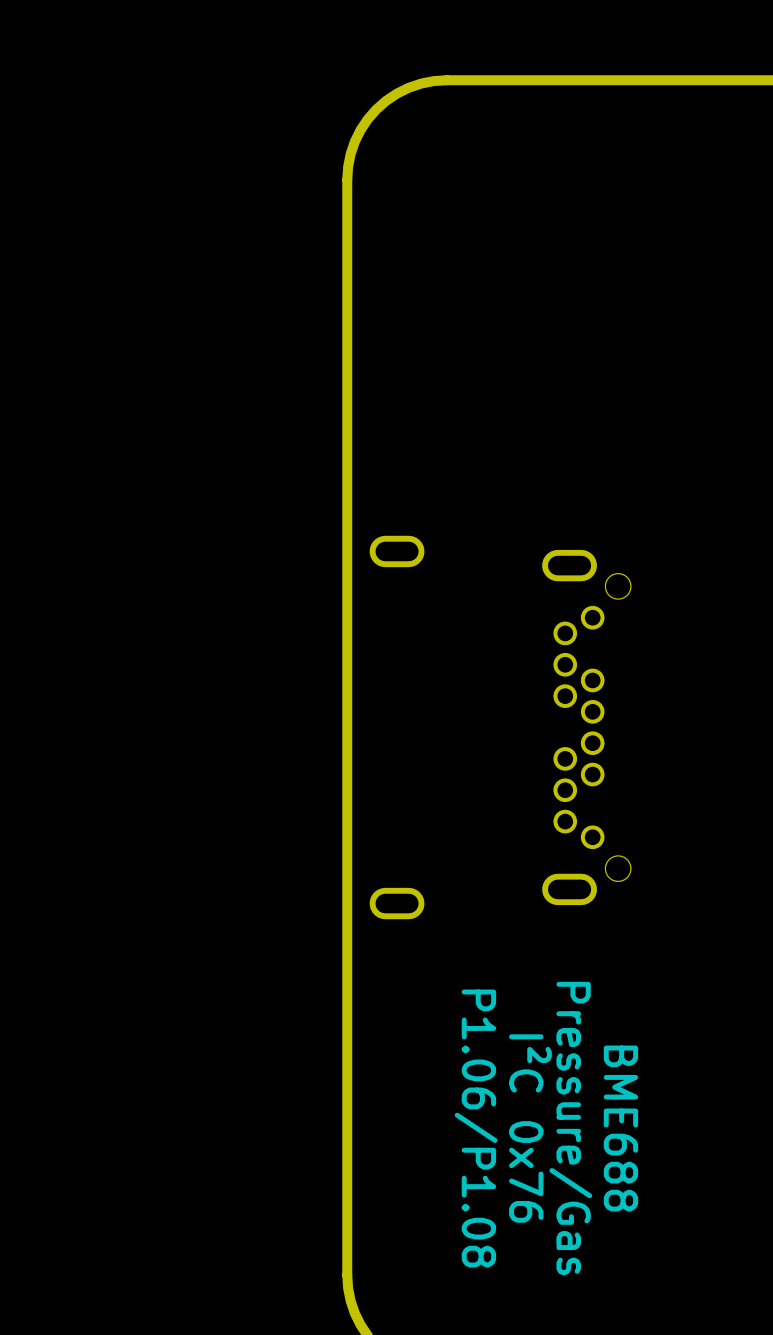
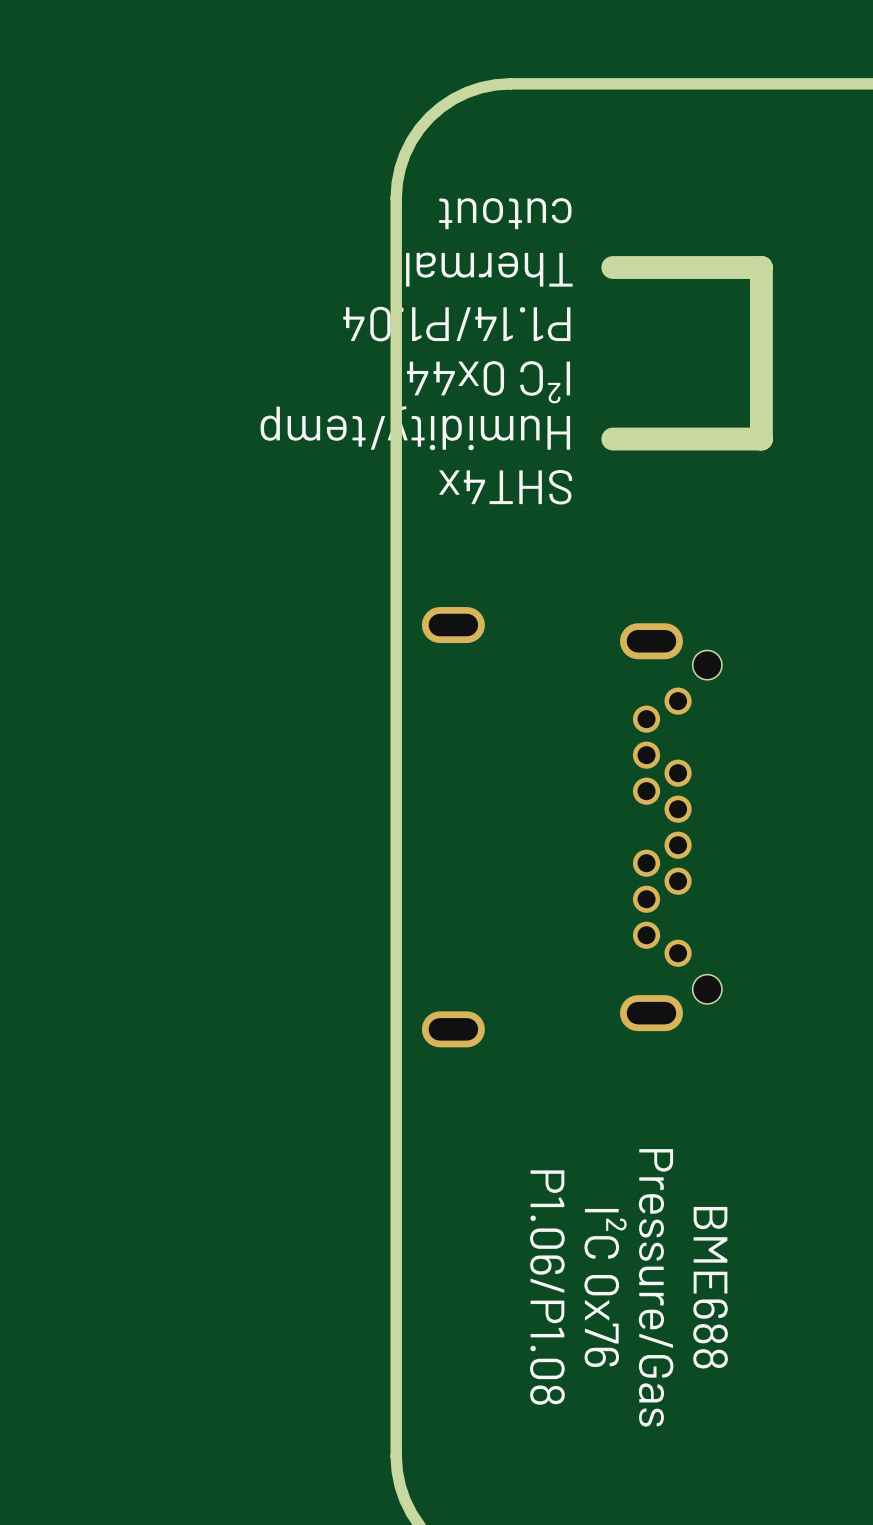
text: none -> cutout (505, 213)
board edge: none -> (612, 267) (761, 267) (761, 439) (612, 439)
text: none -> Thermal (489, 269)
text: none -> P1.14/P1.04 (456, 324)
text: none -> I²C 0x44 (488, 382)
text: none -> Humidity/temp (415, 428)
text: none -> SHT4x (505, 487)

